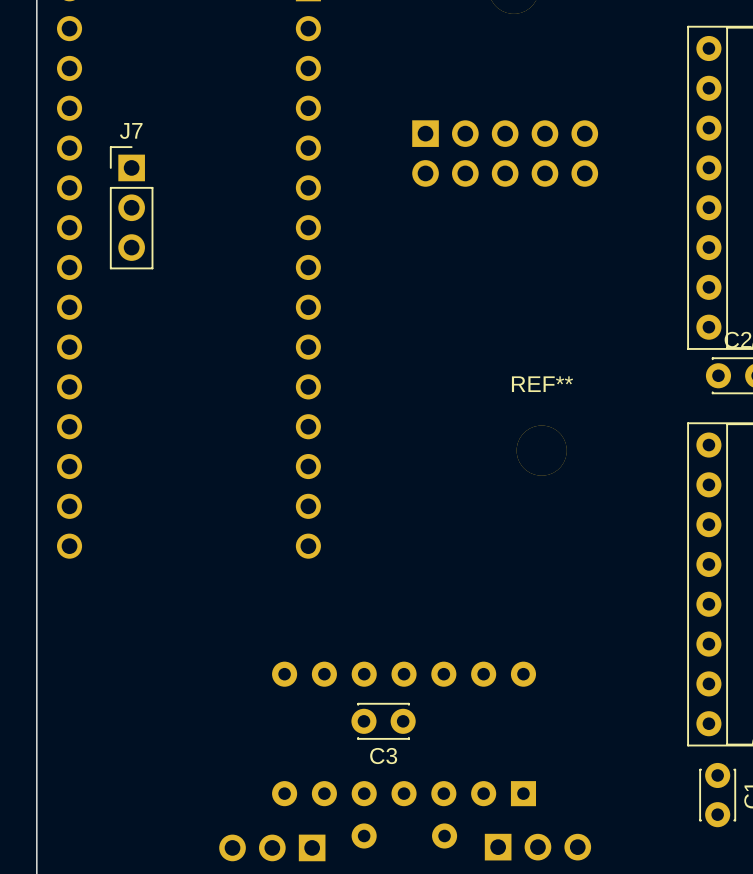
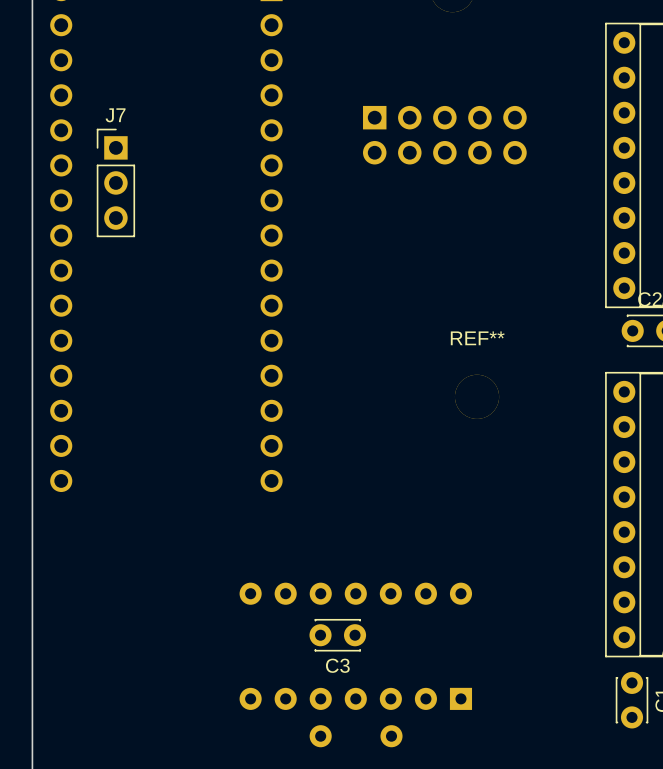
part: (272, 847) -> none
part: (537, 847) -> none

